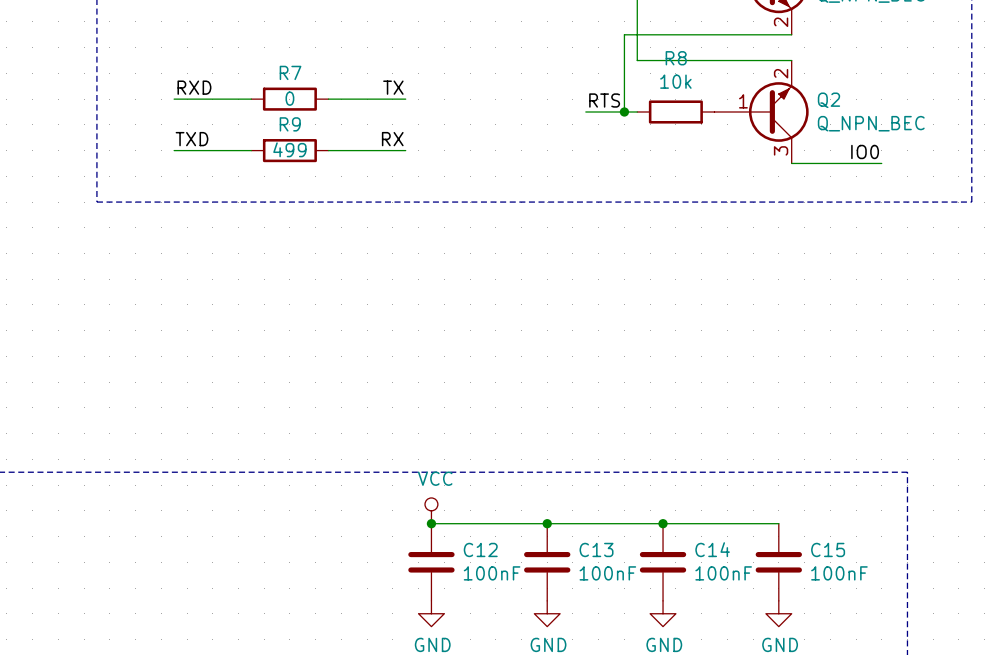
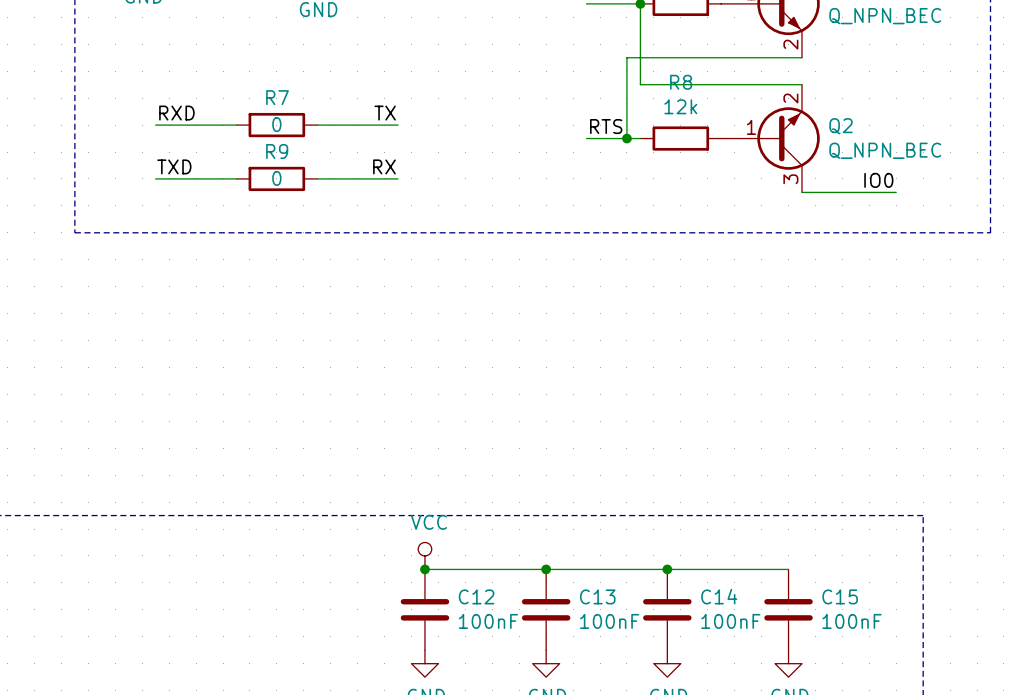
R8 value: 10k (675, 81) -> 12k (680, 106)
R9 value: 499 (289, 149) -> 0 (276, 178)

